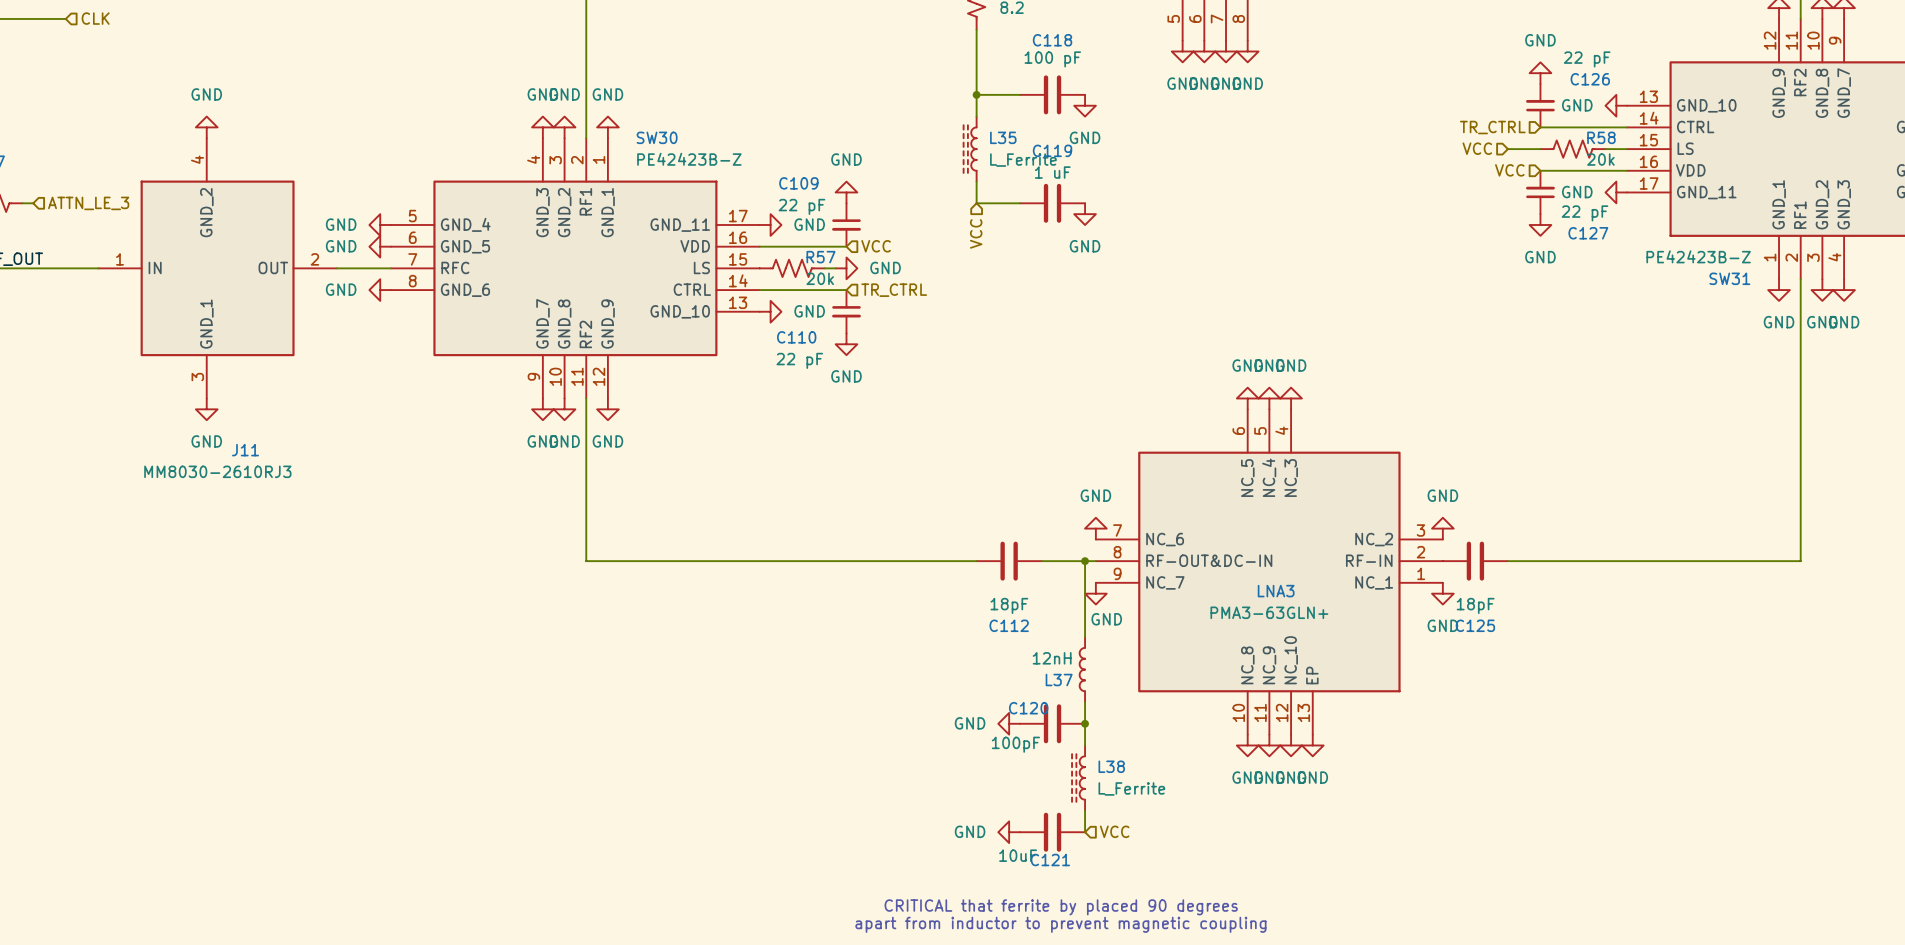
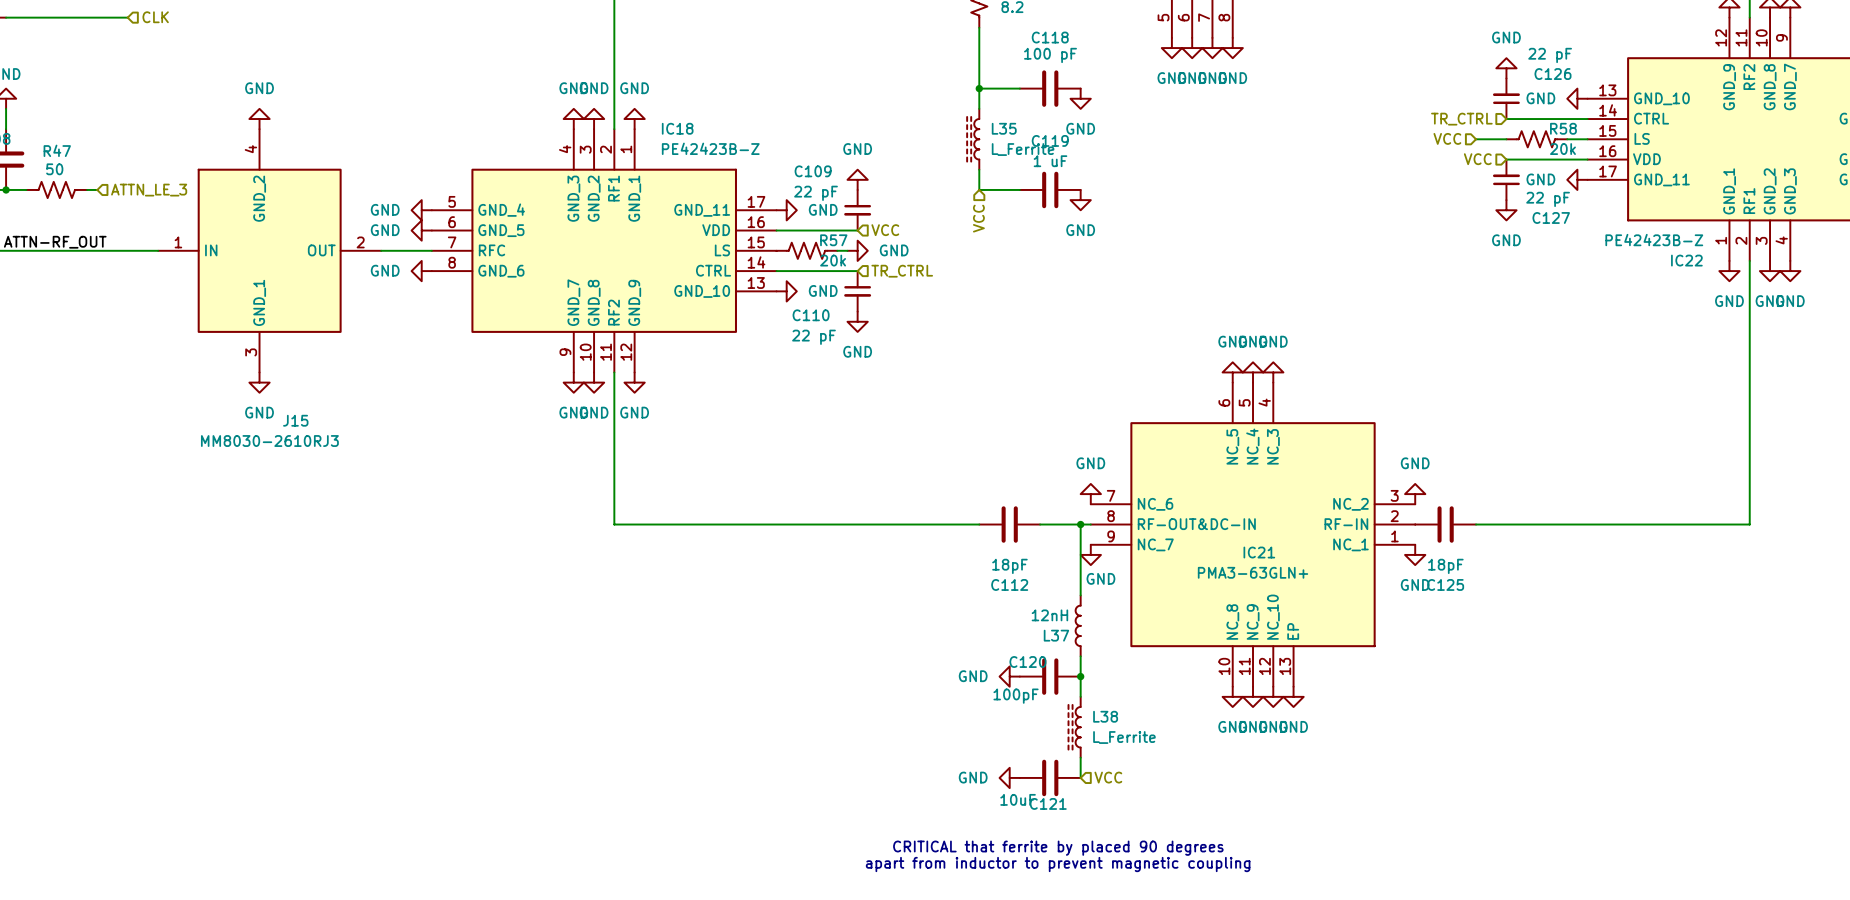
SW30 name: SW30 (657, 137) -> IC18 (677, 128)
SW31 name: SW31 (1729, 278) -> IC22 (1686, 260)
J11 name: J11 (245, 450) -> J15 (295, 420)
LNA3 name: LNA3 (1276, 591) -> IC21 (1259, 552)

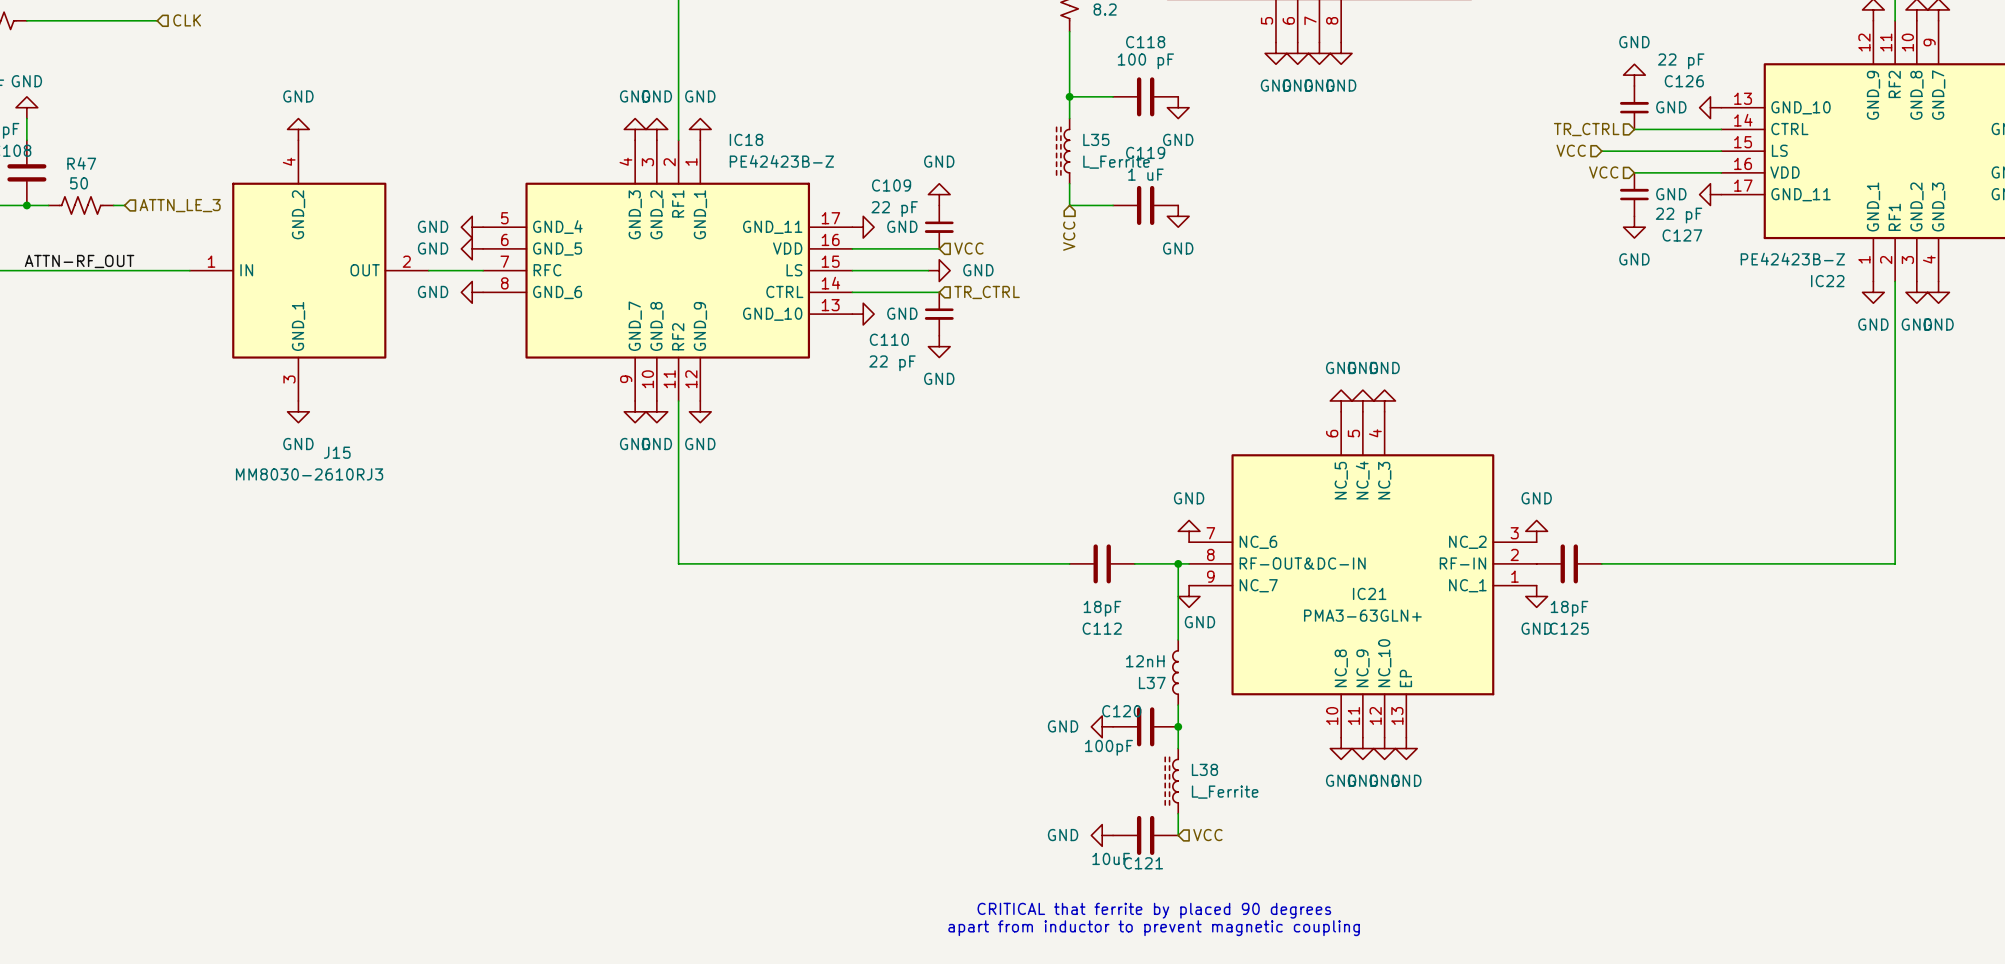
R58: 20k (1536, 139) -> none
R57: 20k (806, 250) -> none

